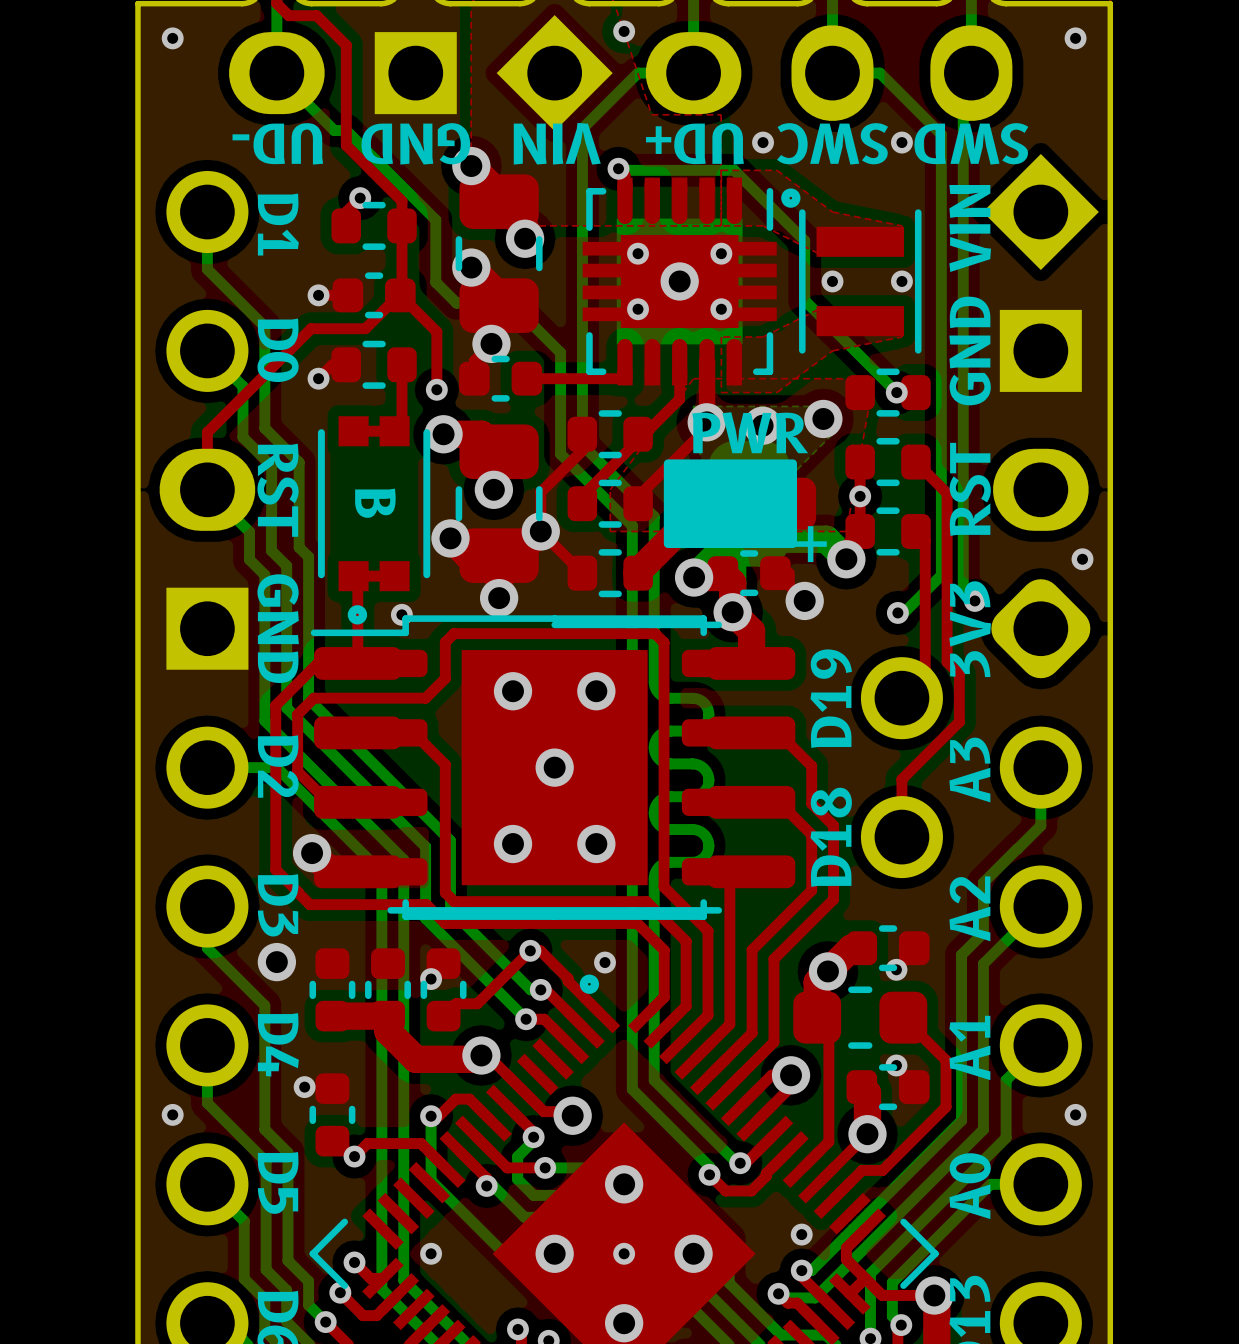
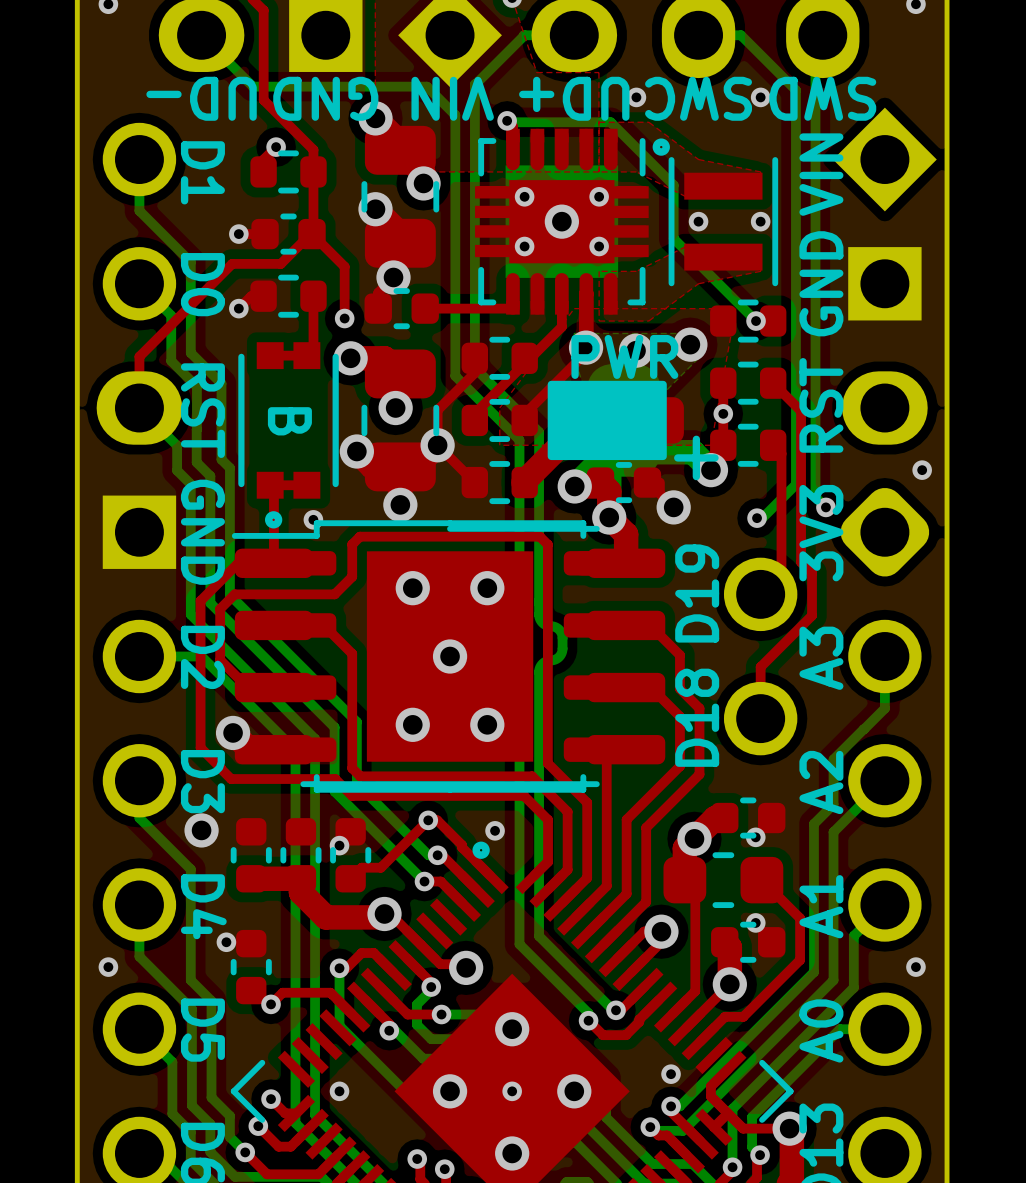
bottom track: (346, 130) (435, 219) (435, 282) (456, 303) (510, 303) (560, 352) -> (263, 86) (426, 86) (455, 115) (455, 285)
bottom track: (654, 681) (656, 690) (662, 696) (698, 699) (705, 704) (708, 714) (706, 722) (700, 728) (694, 730) (666, 731) (659, 735) (654, 743) (654, 751) (660, 760) (668, 763) (698, 765) (705, 770) (708, 780) (705, 790) (698, 795) (668, 796) (660, 800) (654, 810) (656, 821) (666, 828) (698, 830) (705, 835) (708, 845) (705, 855) (698, 861) (662, 864) (656, 870) (654, 878) -> (539, 579) (539, 618) (544, 624) (558, 628) (562, 637) (562, 650) (559, 656) (554, 659) (544, 662) (539, 669) (539, 755)

